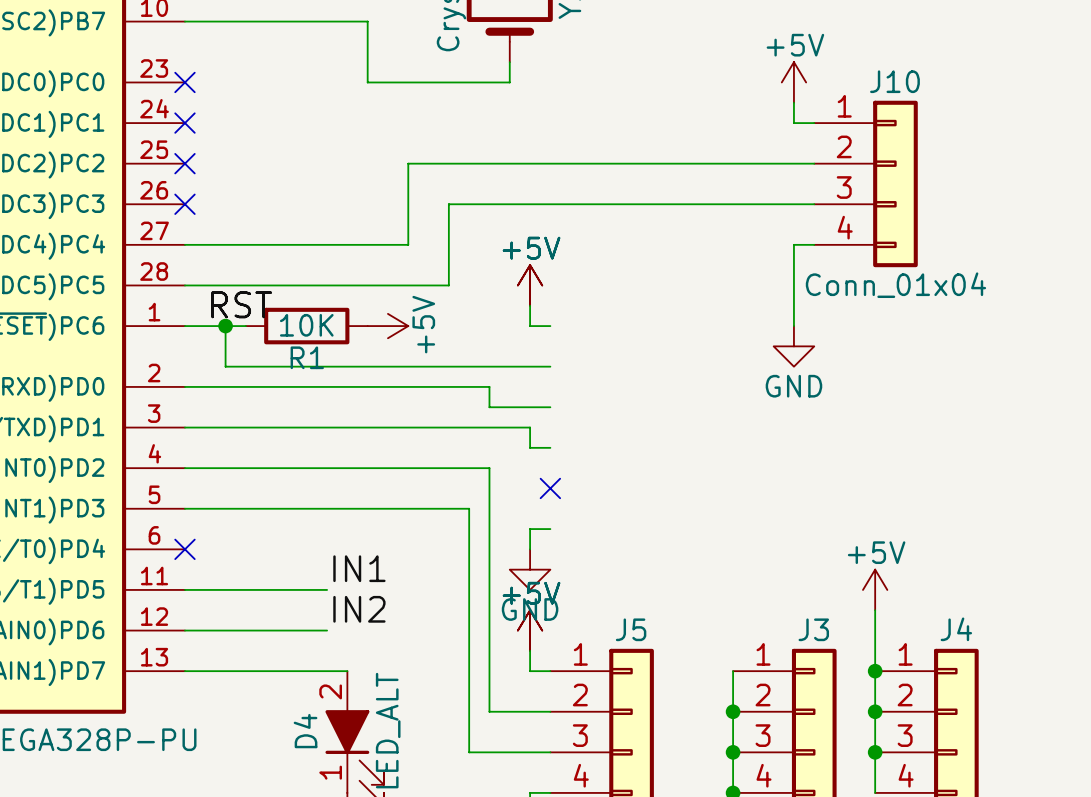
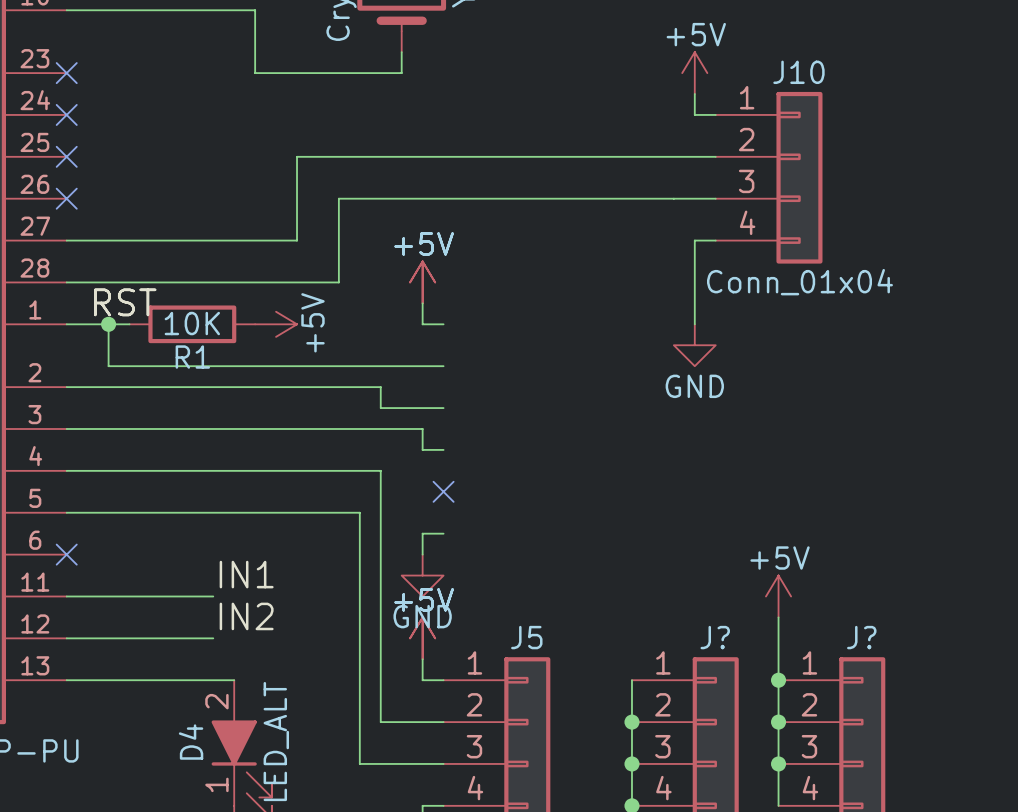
J3 name: J3 (813, 629) -> J? (715, 637)
J4 name: J4 (956, 629) -> J? (861, 637)

